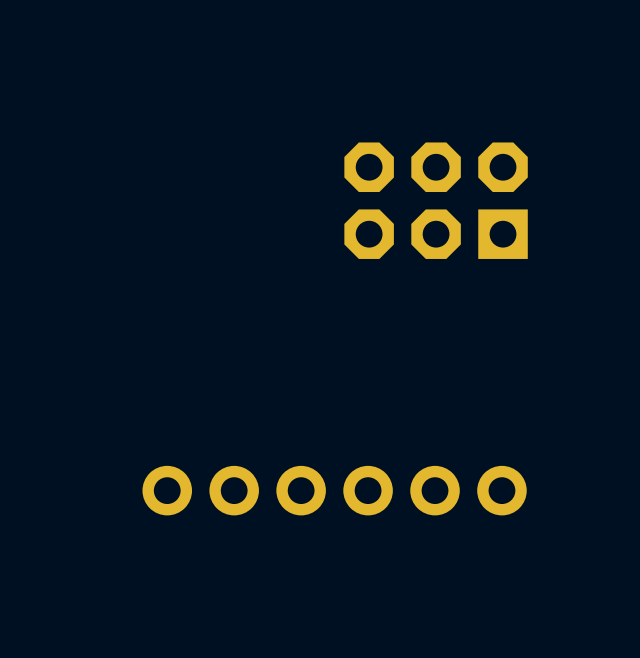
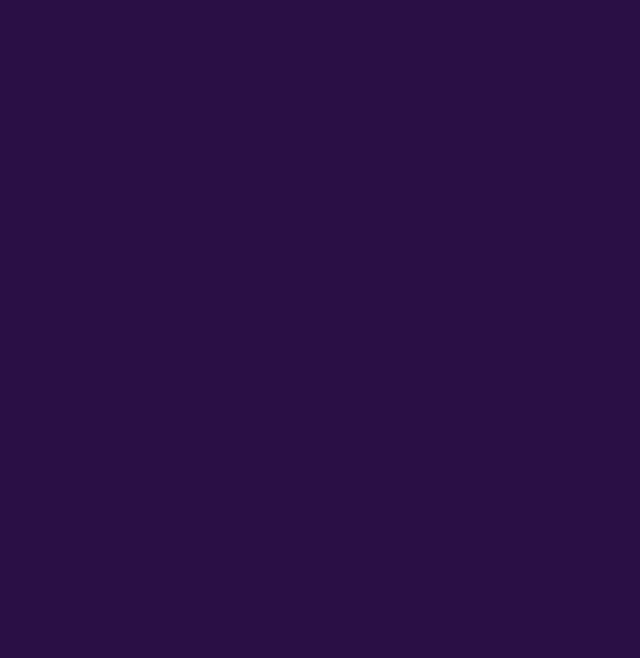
part: (436, 200) -> none
part: (334, 490) -> none

